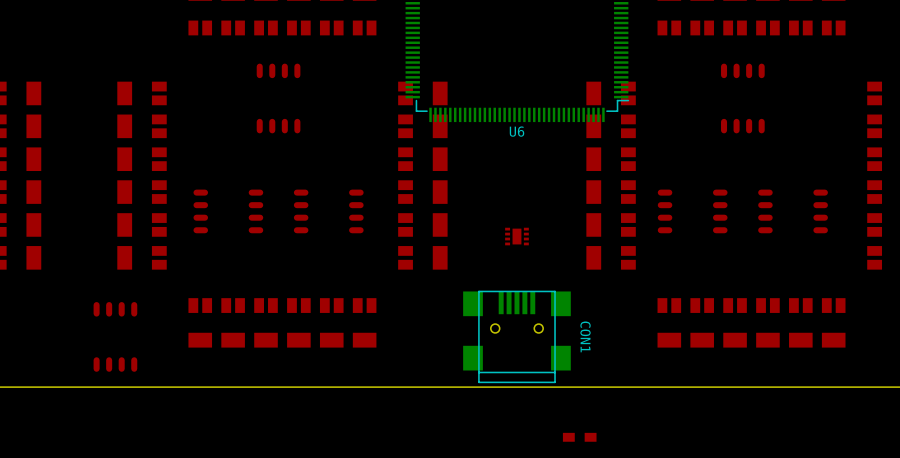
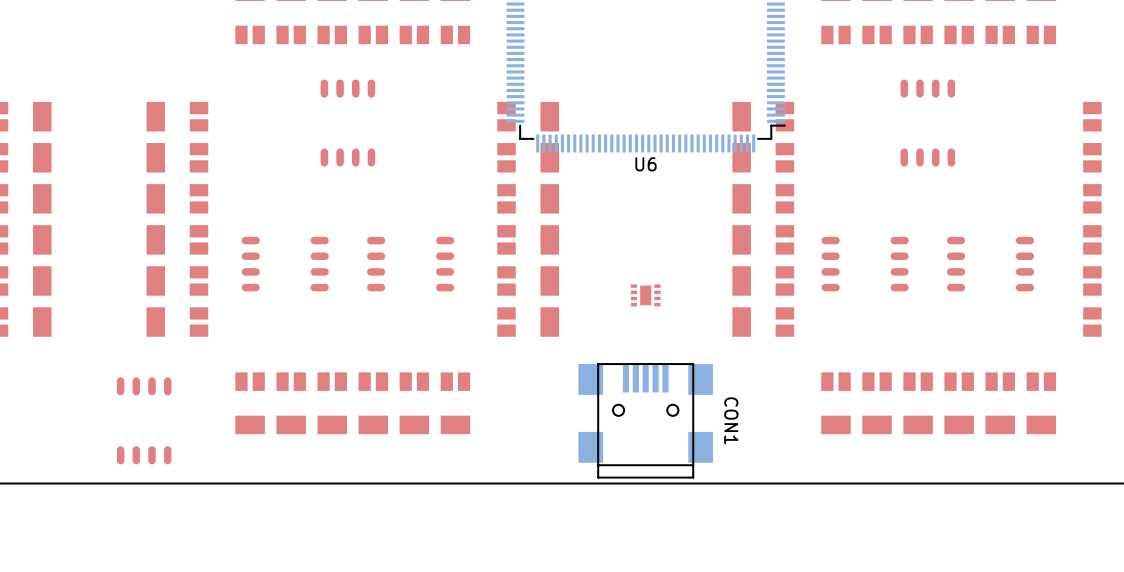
part: (579, 437) -> none

